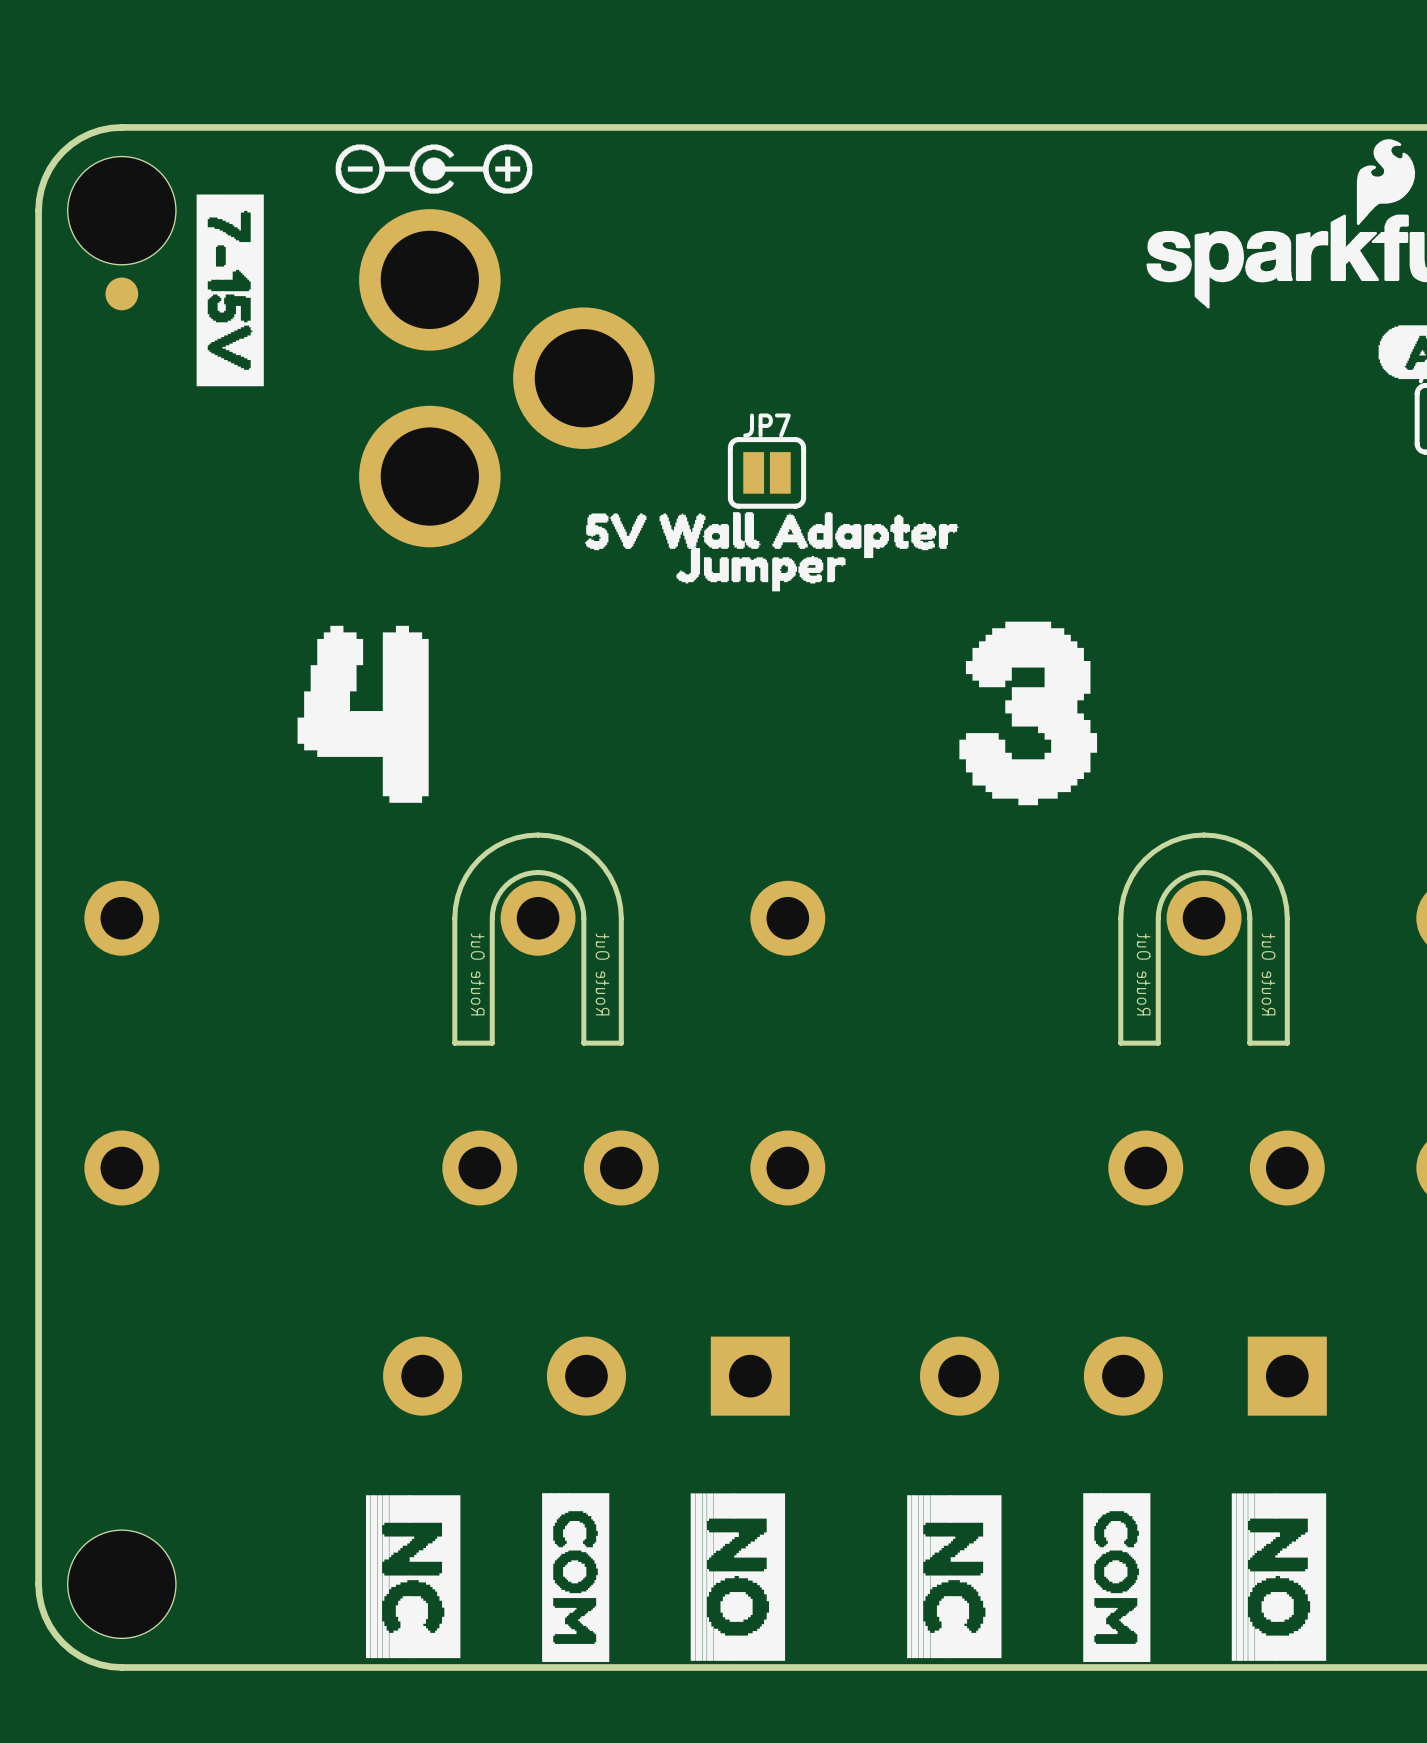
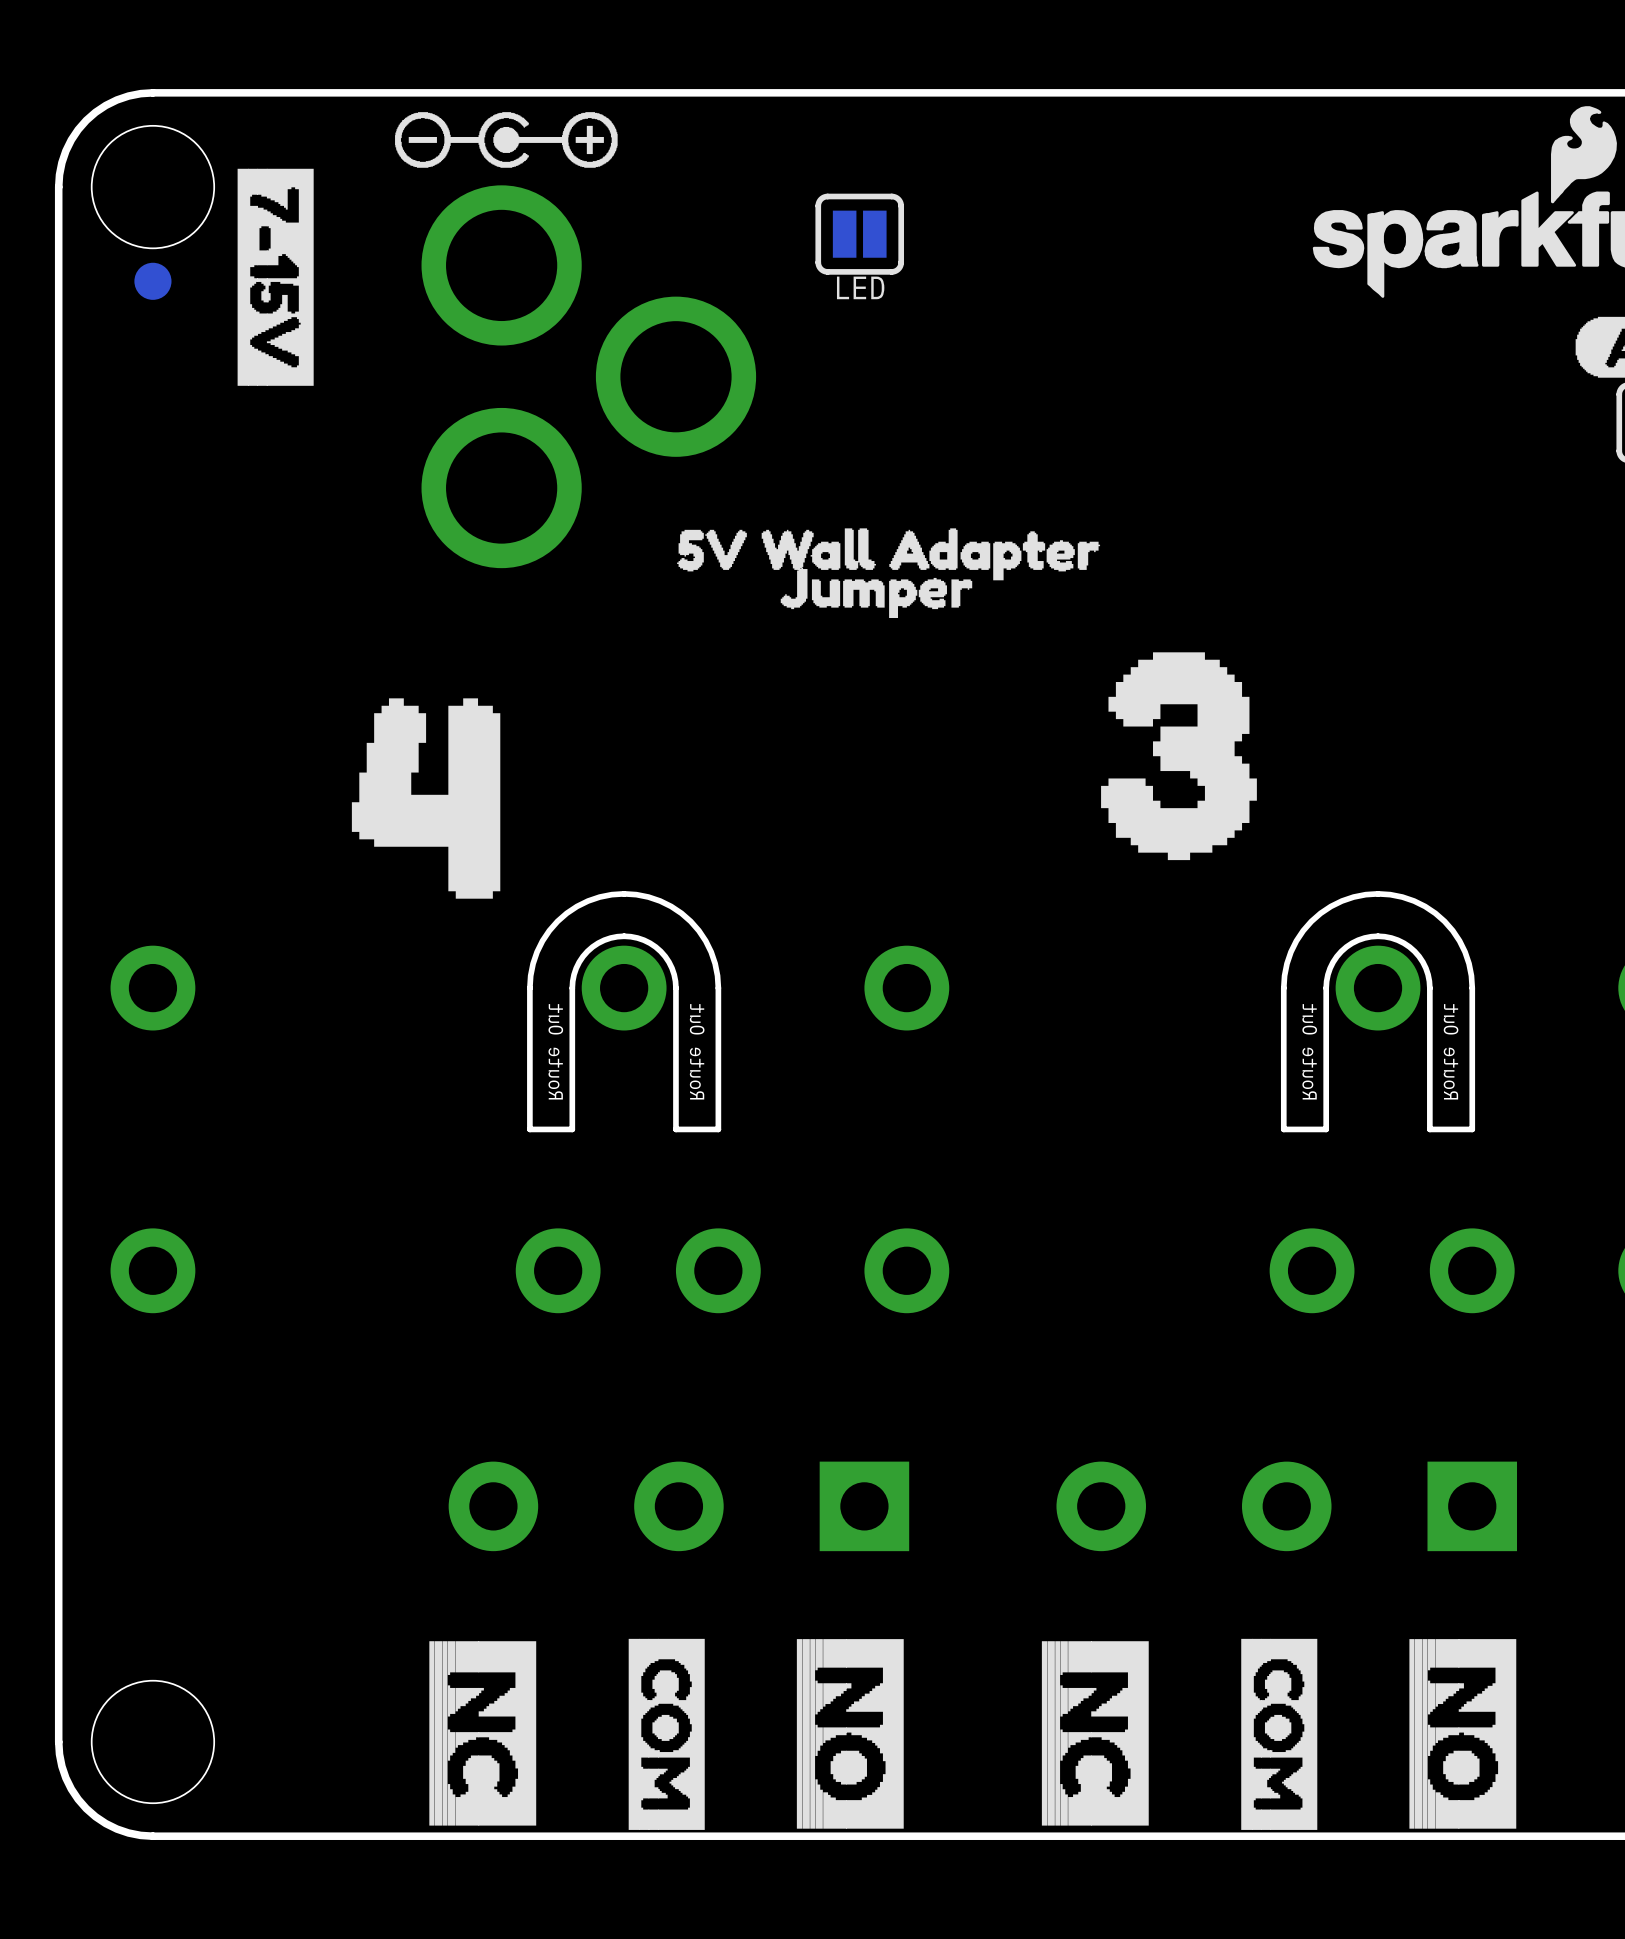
LED: none -> (859, 234)
JP7: (767, 472) -> none
drawing position: (363, 714) -> (426, 798)

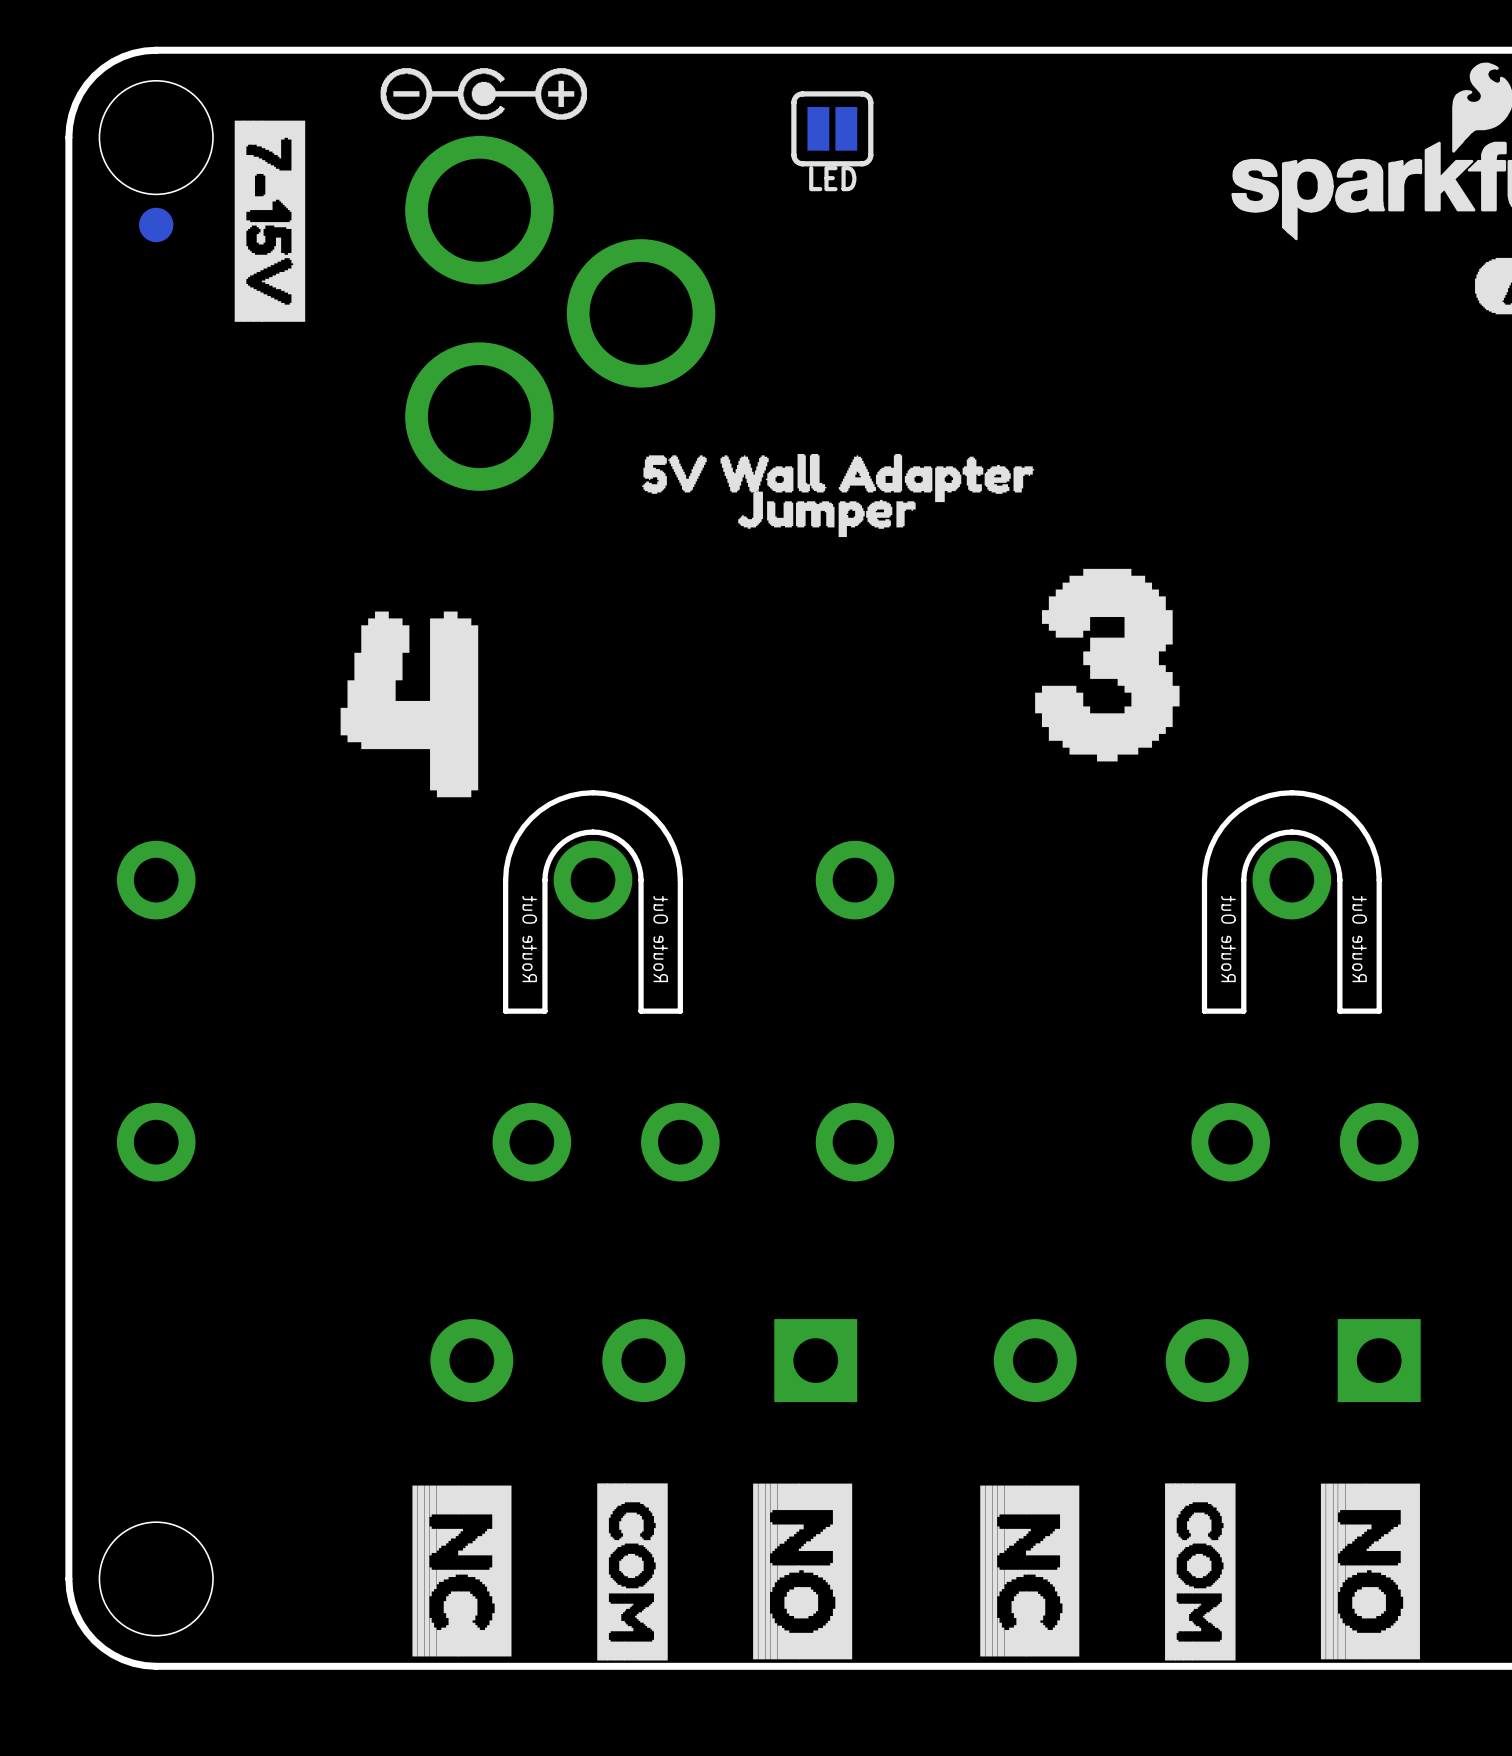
LED position: (859, 234) -> (832, 128)

